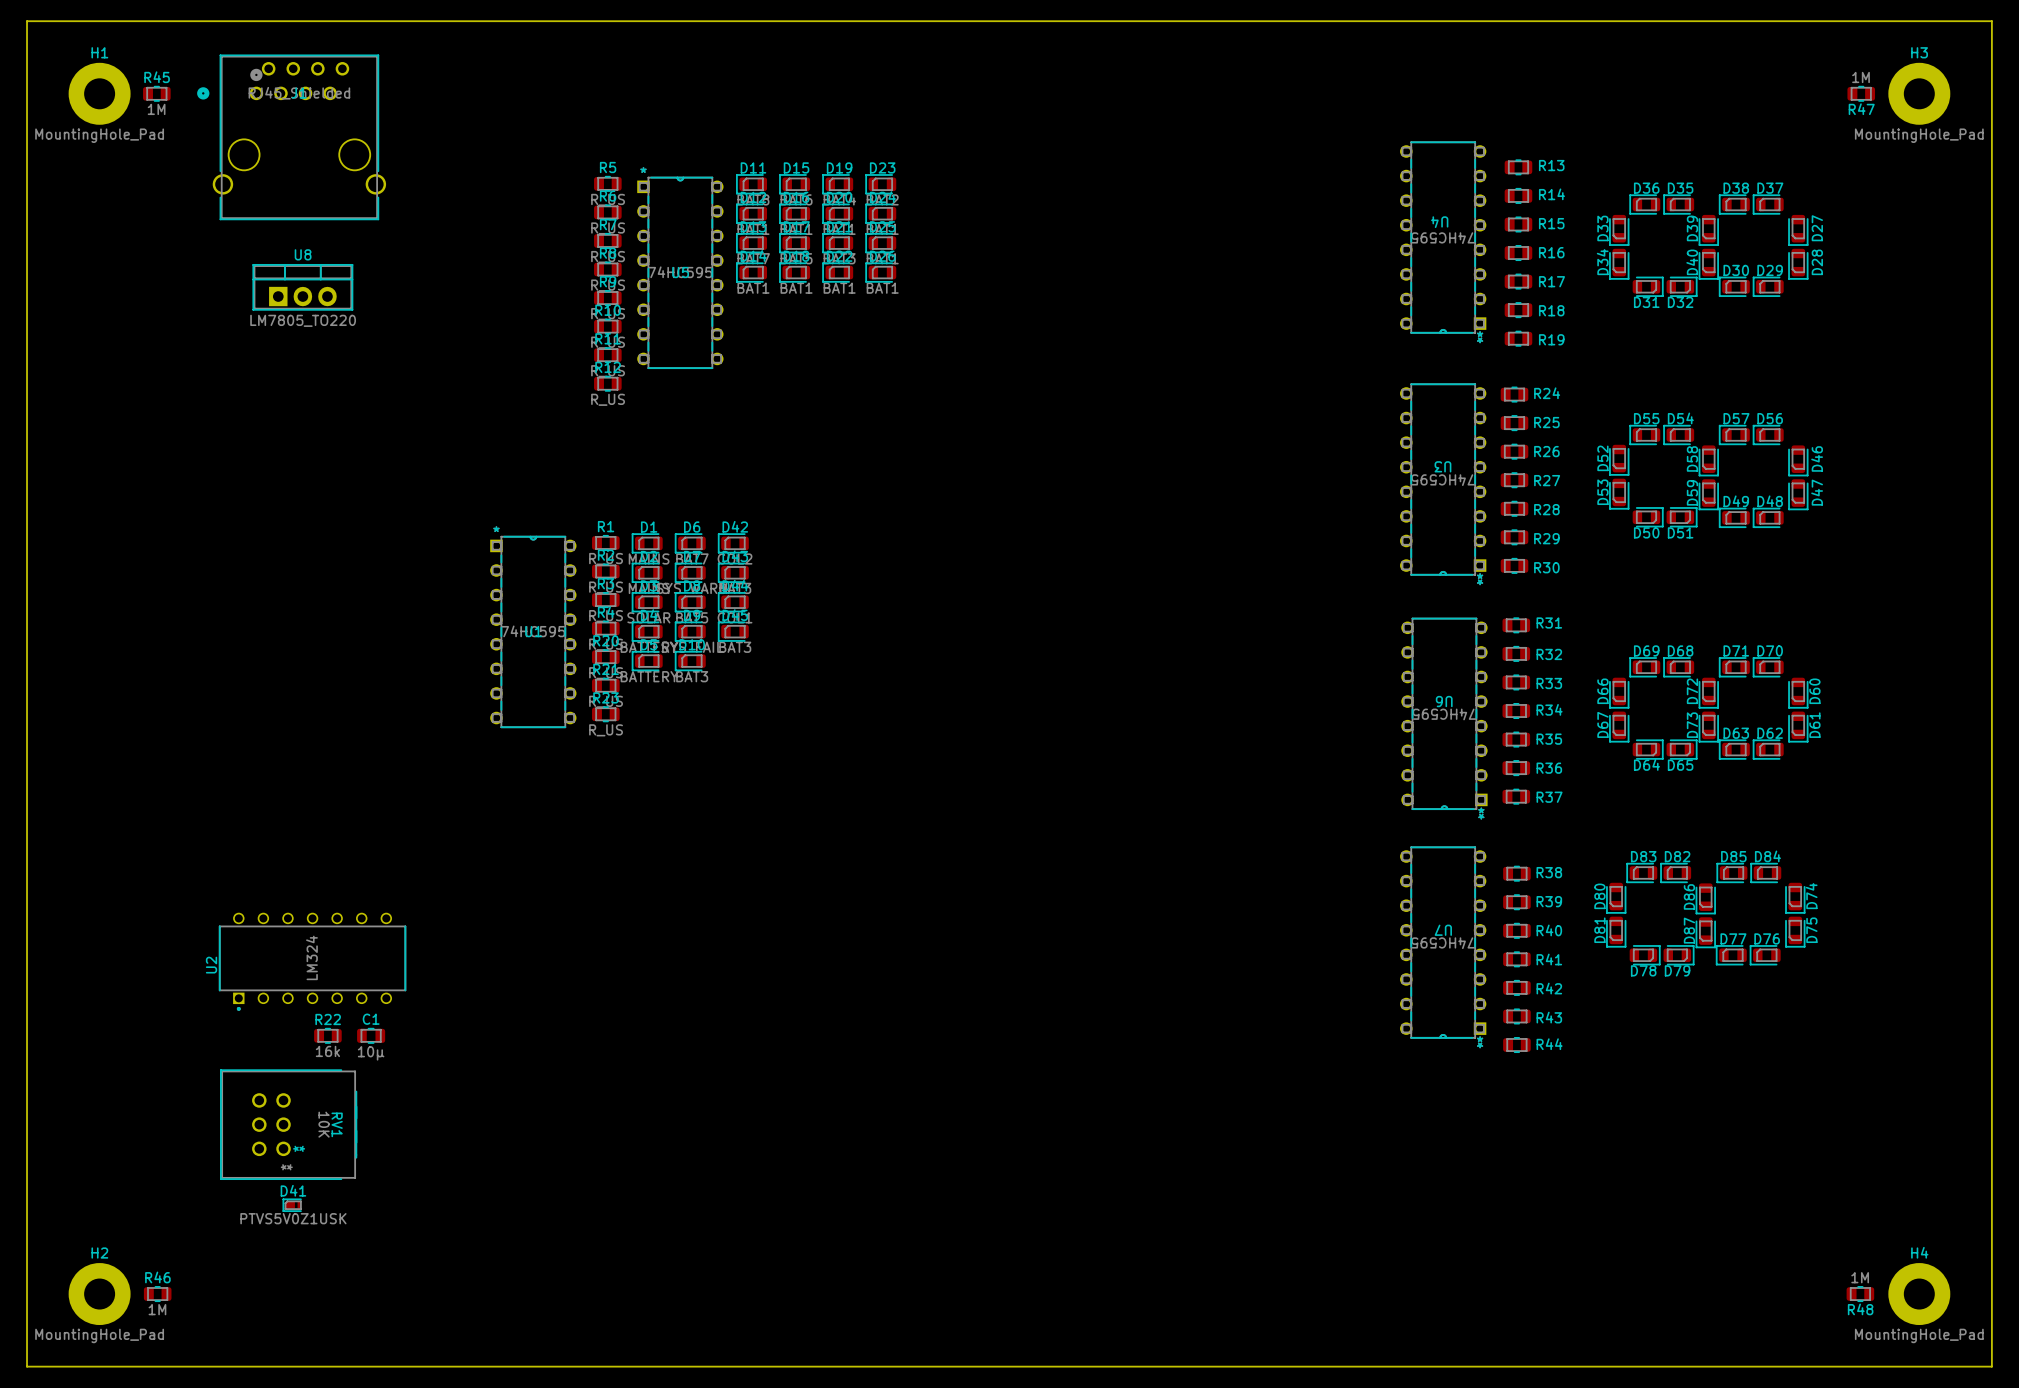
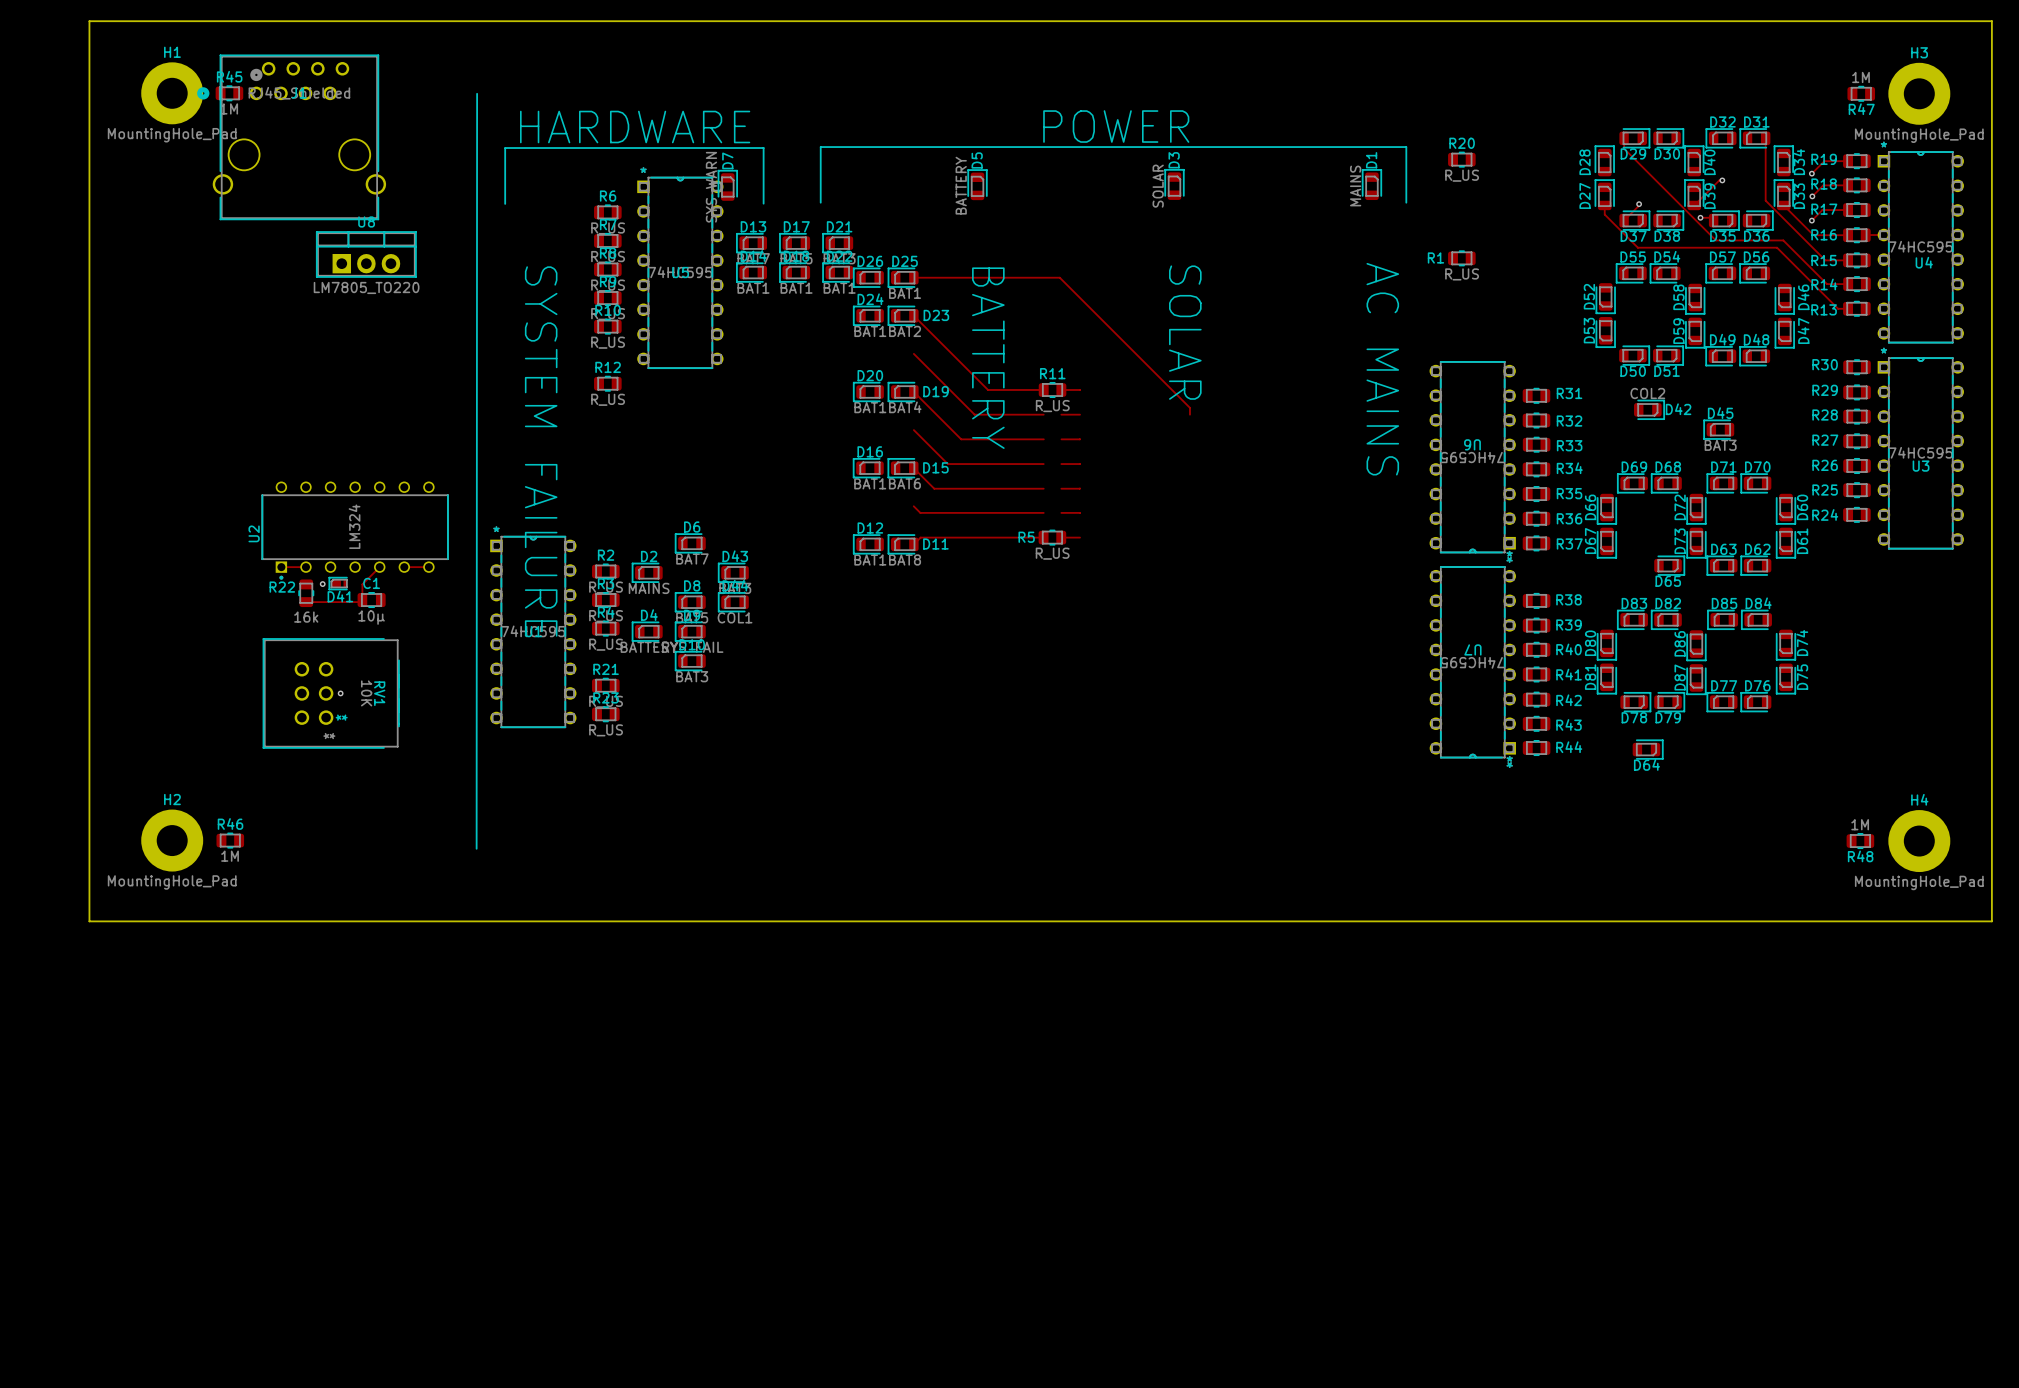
board edge: (89, 21) (27, 21) (27, 1366) (1991, 1366) (1991, 921) -> (89, 21) (89, 921) (1991, 921)
H1 position: (99, 93) -> (172, 93)
R45 position: (156, 93) -> (229, 93)
line: none -> (477, 93) (476, 848)
text: none -> POWER (1116, 126)
text: none -> HARDWARE (635, 127)
track: none -> (1624, 138) (1624, 148) (1715, 240) (1783, 240) (1826, 284) (1848, 284)
track: none -> (1765, 138) (1765, 200) (1825, 260) (1848, 260)
line: none -> (505, 148) (763, 148) (763, 203)
line: none -> (505, 148) (505, 203)
track: none -> (1848, 161) (1824, 161) (1811, 173)
R13 name position: R13 (1551, 165) -> R13 (1824, 309)
R5 name position: R5 (608, 167) -> R5 (1026, 537)
D11 name position: D11 (753, 167) -> D11 (935, 544)
D15 name position: D15 (796, 167) -> D15 (935, 467)
D19 name position: D19 (839, 167) -> D19 (936, 391)
D23 name position: D23 (882, 167) -> D23 (936, 315)
R13 position: (1518, 167) -> (1856, 308)
via: none -> (1811, 173)
track: none -> (1722, 180) (1719, 180) (1694, 205)
via: none -> (1722, 180)
R5 position: (607, 183) -> (1052, 537)
D11 position: (751, 184) -> (903, 544)
D15 position: (794, 184) -> (903, 468)
D19 position: (837, 184) -> (903, 391)
D23 position: (880, 184) -> (903, 315)
track: none -> (1848, 185) (1823, 185) (1812, 196)
R14 name position: R14 (1551, 194) -> R14 (1824, 284)
R14 position: (1518, 195) -> (1857, 284)
via: none -> (1812, 196)
line: none -> (820, 202) (820, 147) (1406, 147) (1406, 202)
track: none -> (1639, 204) (1624, 220)
via: none -> (1639, 204)
D36 rotation: 0° (1644, 204) -> 180° (1758, 220)
D36 position: (1644, 204) -> (1758, 220)
D35 rotation: 0° (1678, 204) -> 180° (1724, 220)
D35 position: (1678, 204) -> (1724, 220)
D38 rotation: 0° (1734, 204) -> 180° (1668, 220)
D38 position: (1734, 204) -> (1668, 220)
D37 rotation: 0° (1768, 204) -> 180° (1634, 220)
D37 position: (1768, 204) -> (1634, 220)
track: none -> (1604, 205) (1604, 214) (1637, 247) (1777, 247) (1838, 308) (1848, 308)
track: none -> (1783, 205) (1813, 235) (1848, 235)
track: none -> (1848, 210) (1822, 210) (1811, 220)
D12 position: (751, 213) -> (868, 544)
D16 position: (794, 213) -> (868, 468)
D20 position: (837, 213) -> (868, 391)
D24 position: (880, 213) -> (868, 315)
track: none -> (1700, 217) (1710, 217) (1713, 220)
via: none -> (1700, 217)
via: none -> (1811, 220)
R15 name position: R15 (1551, 223) -> R15 (1824, 260)
R15 position: (1518, 224) -> (1856, 260)
D33 rotation: 0° (1619, 230) -> 180° (1783, 194)
D33 position: (1619, 230) -> (1783, 194)
D39 rotation: 0° (1708, 230) -> 180° (1694, 194)
D39 position: (1708, 230) -> (1694, 194)
D27 rotation: 0° (1798, 230) -> 180° (1604, 194)
D27 position: (1798, 230) -> (1604, 194)
track: none -> (1883, 235) (1865, 235)
U4 rotation: 0° (1443, 237) -> 180° (1920, 247)
U4 position: (1443, 237) -> (1920, 247)
D25 position: (880, 243) -> (903, 277)
R16 name position: R16 (1551, 252) -> R16 (1824, 234)
R16 position: (1518, 253) -> (1856, 235)
D34 rotation: 0° (1619, 264) -> 180° (1783, 160)
D34 position: (1619, 264) -> (1783, 160)
D40 rotation: 0° (1708, 264) -> 180° (1694, 160)
D40 position: (1708, 264) -> (1694, 160)
D28 rotation: 0° (1798, 264) -> 180° (1604, 160)
D28 position: (1798, 264) -> (1604, 160)
D26 position: (880, 272) -> (868, 277)
track: none -> (913, 277) (1059, 277) (1189, 407) (1189, 414)
R17 position: (1518, 281) -> (1856, 210)
R17 name position: R17 (1551, 281) -> R17 (1824, 209)
D31 rotation: 0° (1648, 286) -> 180° (1755, 138)
D31 position: (1648, 286) -> (1755, 138)
D32 rotation: 0° (1681, 286) -> 180° (1721, 138)
D32 position: (1681, 286) -> (1721, 138)
D30 rotation: 0° (1734, 286) -> 180° (1668, 138)
D30 position: (1734, 286) -> (1668, 138)
D29 rotation: 0° (1768, 286) -> 180° (1634, 138)
D29 position: (1768, 286) -> (1634, 138)
U8 position: (302, 287) -> (366, 254)
D26 value: BAT1 (882, 288) -> none
R18 position: (1518, 310) -> (1856, 185)
R18 name position: R18 (1551, 310) -> R18 (1824, 184)
track: none -> (913, 315) (988, 389) (1043, 389)
text: none -> SOLAR (1185, 332)
R19 position: (1518, 338) -> (1856, 161)
R19 name position: R19 (1551, 339) -> R19 (1824, 159)
track: none -> (913, 353) (974, 414) (1043, 414)
R11 position: (607, 355) -> (1052, 389)
text: none -> BATTERY (988, 358)
text: none -> AC MAINS (1382, 369)
track: none -> (1061, 389) (1079, 389)
track: none -> (913, 391) (961, 439) (1043, 439)
R24 name position: R24 (1547, 393) -> R24 (1825, 514)
R24 position: (1514, 394) -> (1856, 514)
track: none -> (1061, 414) (1080, 414)
R25 name position: R25 (1546, 422) -> R25 (1825, 490)
R25 position: (1514, 423) -> (1857, 490)
track: none -> (913, 430) (947, 464) (1043, 464)
D55 position: (1644, 435) -> (1631, 273)
D54 position: (1678, 435) -> (1665, 273)
D57 position: (1734, 435) -> (1720, 273)
D56 position: (1768, 435) -> (1754, 273)
track: none -> (1061, 439) (1079, 439)
text: none -> SYSTEM FAILURE (541, 451)
R26 position: (1514, 451) -> (1857, 465)
R26 name position: R26 (1546, 451) -> R26 (1825, 465)
D52 position: (1619, 460) -> (1605, 298)
D58 position: (1708, 460) -> (1695, 299)
D46 position: (1798, 460) -> (1784, 299)
track: none -> (1080, 463) (1061, 464)
track: none -> (913, 468) (934, 488) (1043, 488)
U3 rotation: 0° (1443, 479) -> 180° (1920, 453)
U3 position: (1443, 479) -> (1920, 453)
R27 position: (1514, 480) -> (1857, 441)
R27 name position: R27 (1547, 480) -> R27 (1825, 440)
track: none -> (1080, 488) (1061, 488)
D53 position: (1619, 494) -> (1605, 332)
D59 position: (1708, 494) -> (1695, 332)
D47 position: (1798, 494) -> (1784, 332)
track: none -> (913, 506) (920, 512) (1043, 512)
R28 position: (1514, 508) -> (1857, 416)
R28 name position: R28 (1546, 509) -> R28 (1825, 415)
track: none -> (1061, 512) (1079, 512)
D50 position: (1648, 517) -> (1634, 355)
D51 position: (1681, 517) -> (1668, 355)
D49 position: (1734, 517) -> (1720, 356)
D48 position: (1768, 517) -> (1754, 356)
R1 name position: R1 (606, 526) -> R1 (1435, 257)
D42 name position: D42 (735, 526) -> D42 (1678, 409)
track: none -> (1043, 537) (920, 537) (913, 544)
track: none -> (1061, 537) (1080, 537)
R29 position: (1514, 537) -> (1857, 392)
R29 name position: R29 (1546, 538) -> R29 (1825, 390)
R1 position: (605, 542) -> (1461, 258)
D1 rotation: 0° (647, 543) -> 90° clockwise (1371, 184)
D1 position: (647, 543) -> (1371, 184)
D42 rotation: 0° (733, 543) -> 180° (1649, 409)
D42 position: (733, 543) -> (1649, 409)
R30 position: (1514, 565) -> (1857, 367)
track: none -> (281, 567) (305, 567)
track: none -> (379, 567) (362, 584) (362, 600) (360, 602) (306, 602)
track: none -> (404, 567) (428, 567)
R30 name position: R30 (1546, 567) -> R30 (1825, 364)
D7 rotation: 0° (690, 572) -> 90° clockwise (727, 185)
D7 position: (690, 572) -> (727, 185)
via: none -> (322, 584)
D3 rotation: 0° (647, 602) -> 90° clockwise (1174, 184)
D3 position: (647, 602) -> (1174, 184)
R31 position: (1516, 625) -> (1536, 395)
D45 position: (733, 631) -> (1718, 429)
R32 position: (1516, 653) -> (1536, 420)
R20 position: (605, 657) -> (1461, 159)
D5 rotation: 0° (647, 661) -> 90° clockwise (977, 184)
D5 position: (647, 661) -> (977, 184)
D69 position: (1644, 667) -> (1632, 483)
D68 position: (1678, 667) -> (1666, 483)
D71 position: (1734, 667) -> (1722, 483)
D70 position: (1768, 667) -> (1756, 483)
R33 position: (1516, 682) -> (1536, 444)
via: none -> (340, 693)
D66 position: (1619, 693) -> (1606, 509)
D72 position: (1708, 693) -> (1696, 509)
D60 position: (1798, 693) -> (1785, 509)
R34 position: (1516, 711) -> (1536, 469)
U6 position: (1444, 713) -> (1472, 457)
D67 position: (1619, 726) -> (1606, 543)
D73 position: (1708, 726) -> (1696, 543)
D61 position: (1798, 726) -> (1785, 543)
R35 position: (1516, 739) -> (1536, 494)
D65 position: (1681, 749) -> (1669, 565)
D63 position: (1734, 749) -> (1722, 565)
D62 position: (1768, 749) -> (1756, 565)
R36 position: (1516, 768) -> (1536, 518)
R37 position: (1516, 796) -> (1536, 543)
D83 position: (1641, 872) -> (1632, 619)
D82 position: (1675, 872) -> (1666, 619)
D85 position: (1732, 872) -> (1722, 619)
D84 position: (1765, 872) -> (1756, 619)
R38 position: (1516, 873) -> (1536, 600)
D80 position: (1616, 898) -> (1606, 645)
D86 position: (1705, 898) -> (1696, 645)
D74 position: (1795, 898) -> (1785, 645)
R39 position: (1516, 902) -> (1536, 625)
R40 position: (1516, 930) -> (1536, 649)
D81 position: (1616, 932) -> (1606, 678)
D87 position: (1705, 932) -> (1696, 679)
D75 position: (1795, 932) -> (1785, 678)
U7 position: (1443, 942) -> (1472, 662)
D78 position: (1645, 955) -> (1635, 702)
D79 position: (1678, 955) -> (1669, 702)
D77 position: (1731, 955) -> (1722, 702)
D76 position: (1765, 955) -> (1756, 702)
R41 position: (1516, 959) -> (1536, 674)
U2 position: (312, 961) -> (355, 530)
R42 position: (1516, 987) -> (1536, 699)
R43 position: (1516, 1016) -> (1536, 723)
R22 name position: R22 (328, 1019) -> R22 (282, 587)
R22 rotation: 0° (327, 1035) -> 90° clockwise (306, 593)
R22 position: (327, 1035) -> (306, 593)
C1 position: (371, 1035) -> (371, 600)
R44 position: (1516, 1045) -> (1536, 748)
RV1 position: (288, 1124) -> (331, 693)
D41 name position: D41 (293, 1190) -> D41 (340, 596)
D41 position: (292, 1205) -> (338, 583)
D41 value: PTVS5V0Z1USK (293, 1218) -> none
H2 position: (99, 1294) -> (172, 840)
R46 position: (157, 1294) -> (230, 840)
R48 position: (1860, 1294) -> (1860, 841)
H4 position: (1919, 1294) -> (1919, 841)

